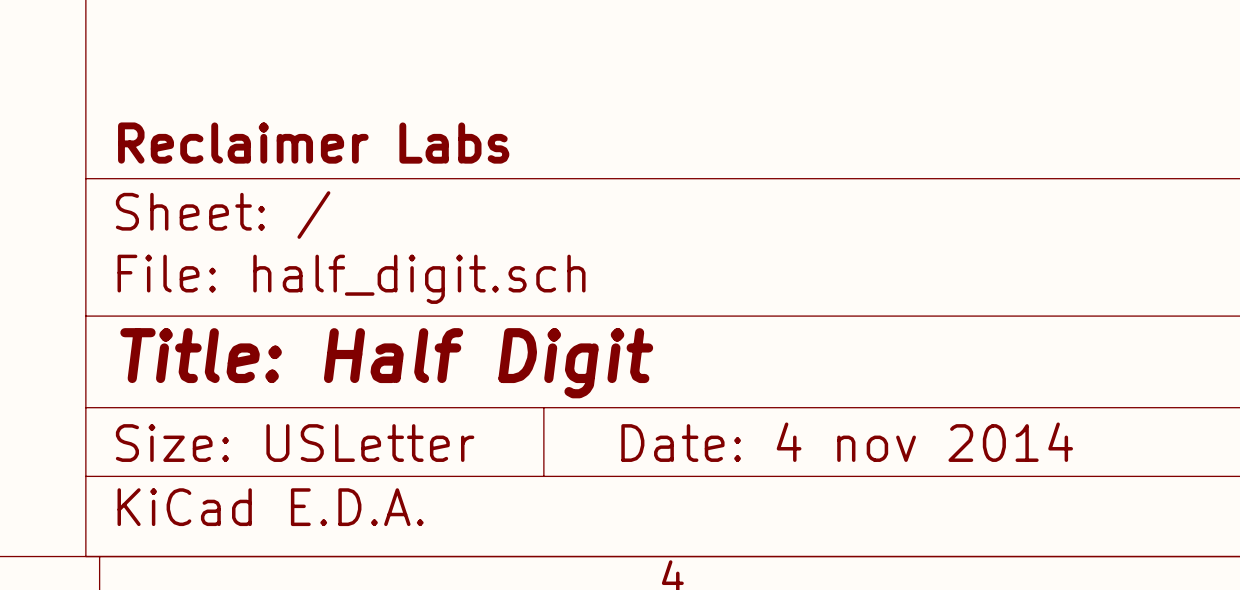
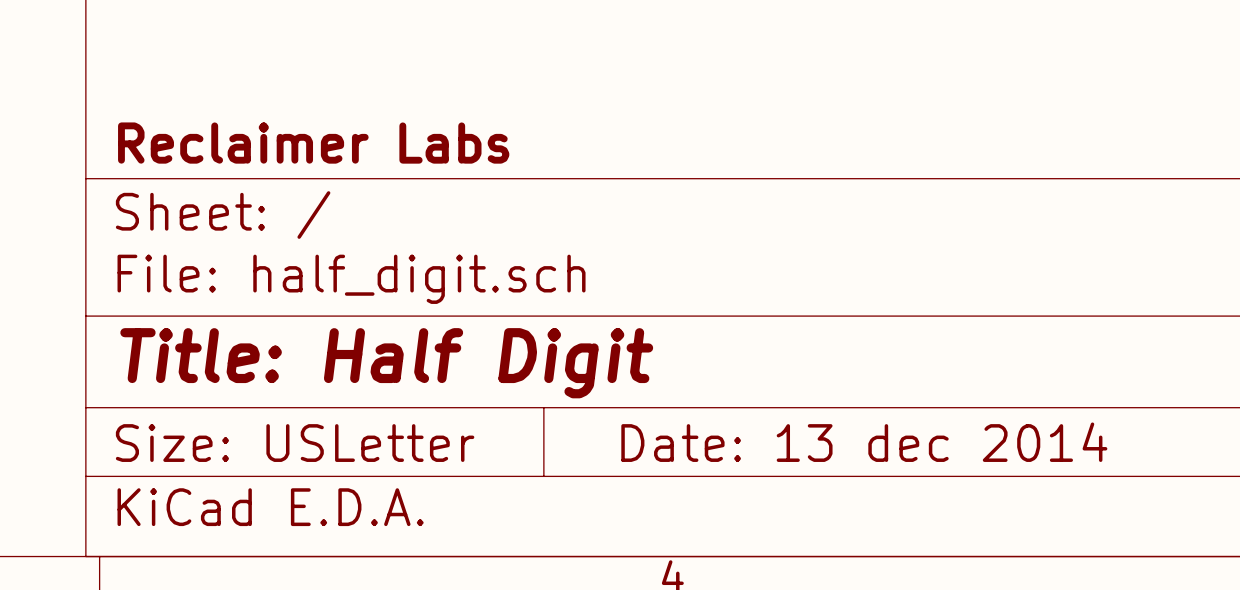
title block: Date: 4 nov 2014 (847, 442) -> Date: 13 dec 2014 (864, 442)

